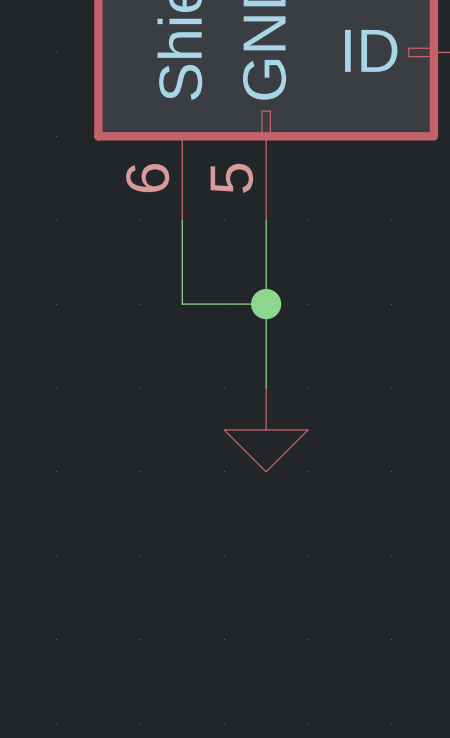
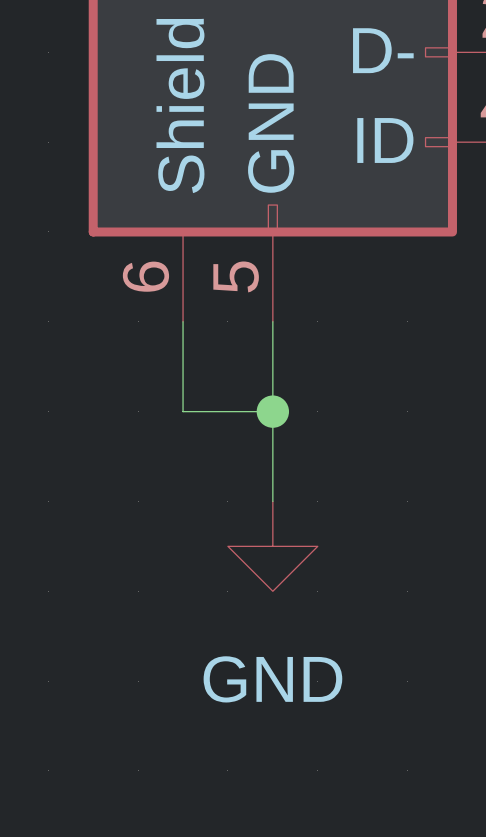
power symbol text: none -> GND (272, 679)

